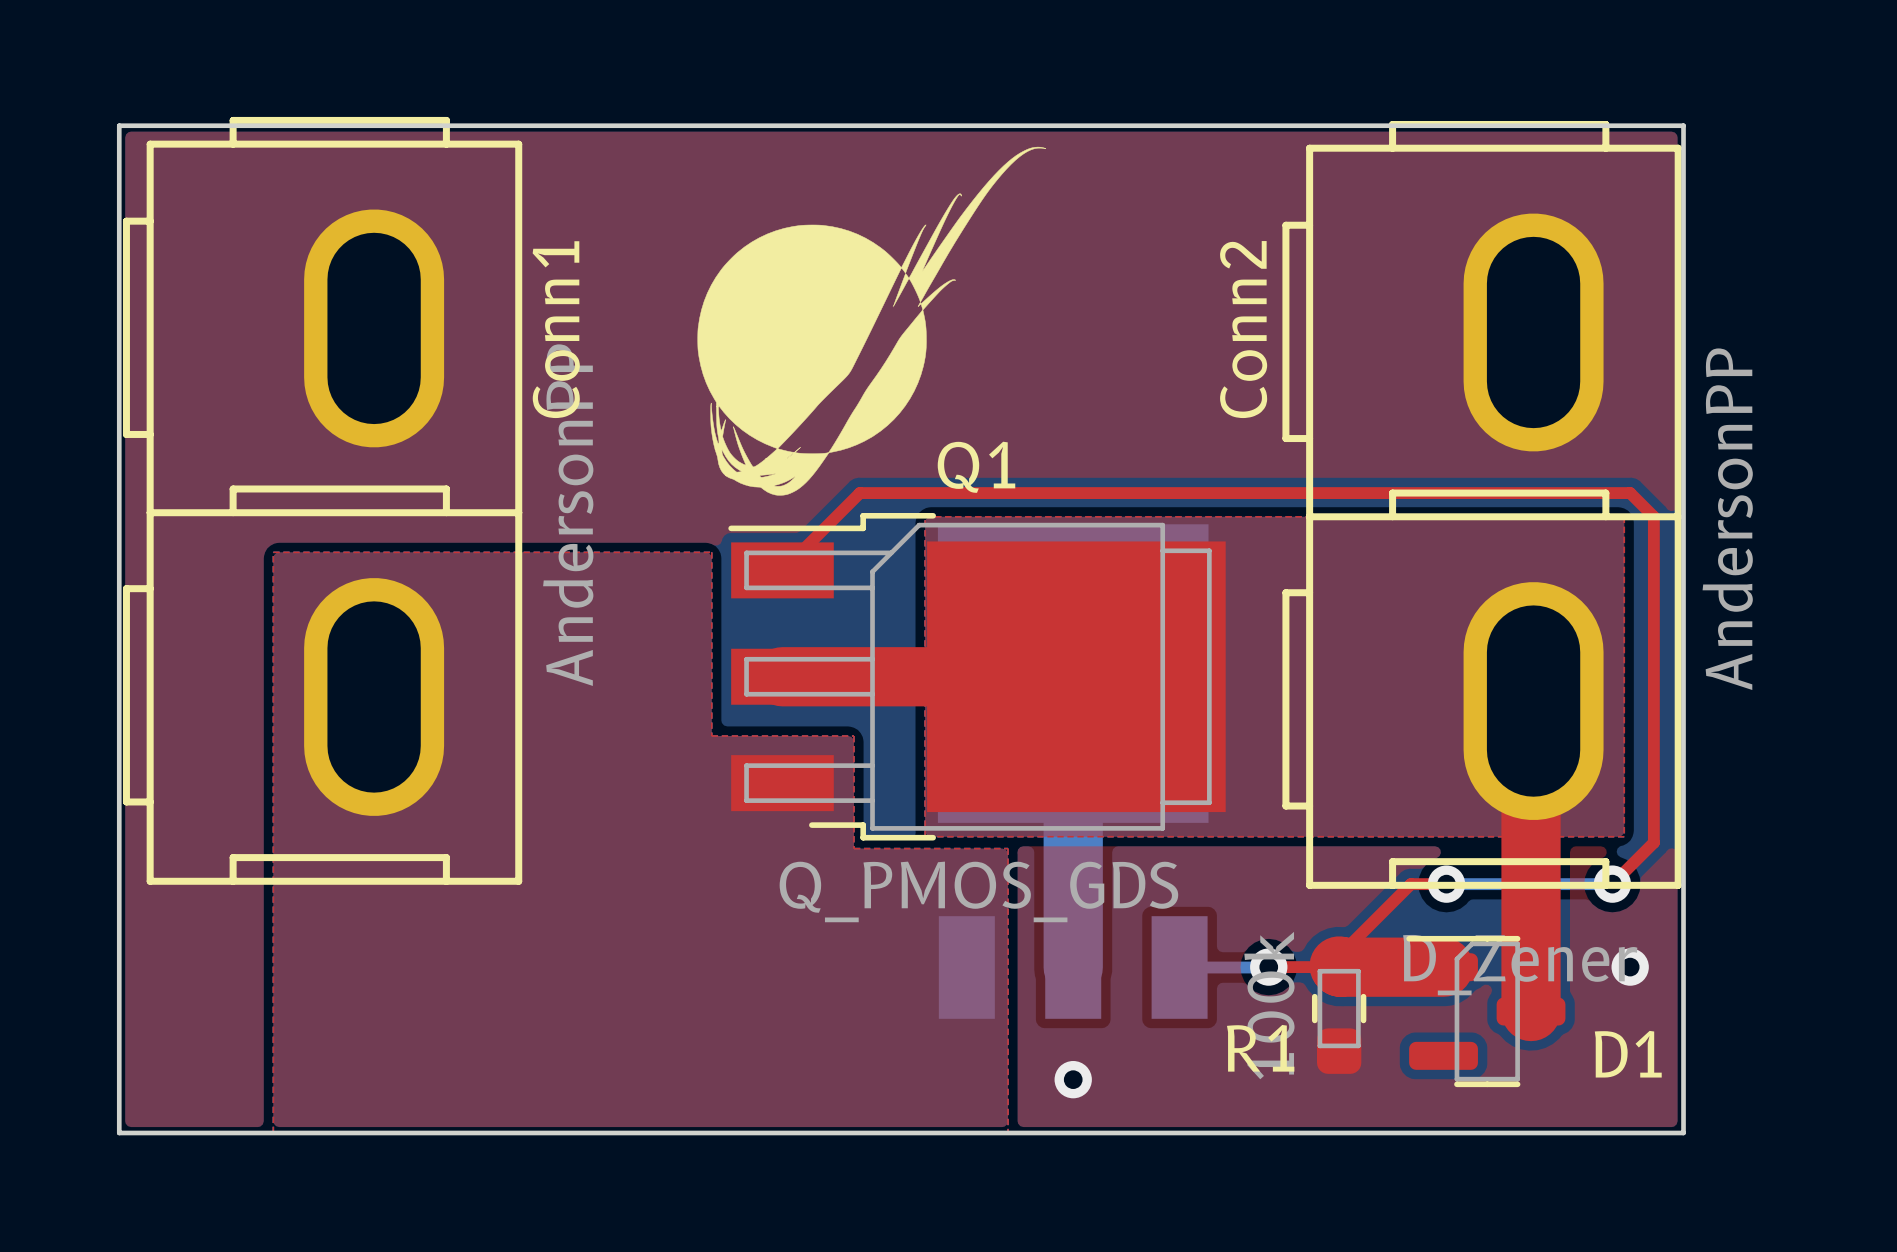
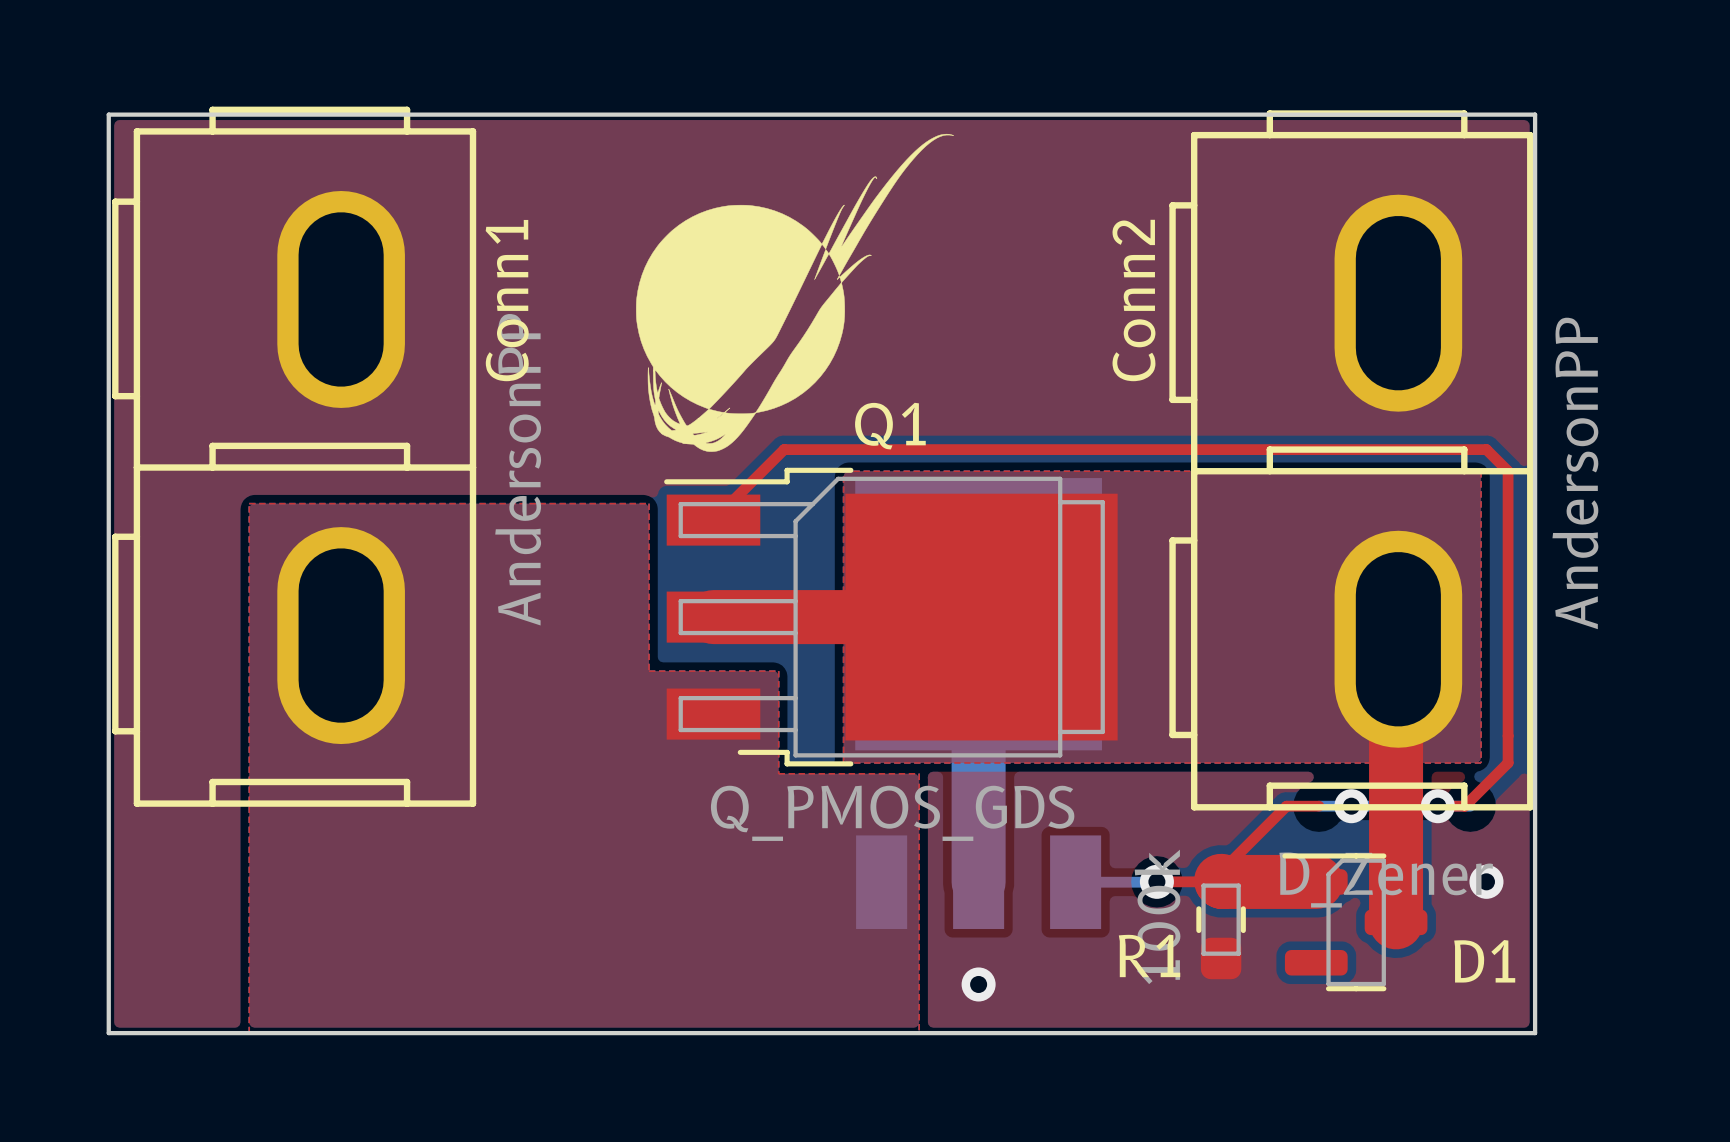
top track: (1653, 836) (1653, 842) (1612, 884) -> (1508, 762) (1464, 806) (1437, 806)
via position: (1446, 884) -> (1351, 806)
via position: (1612, 884) -> (1437, 806)

